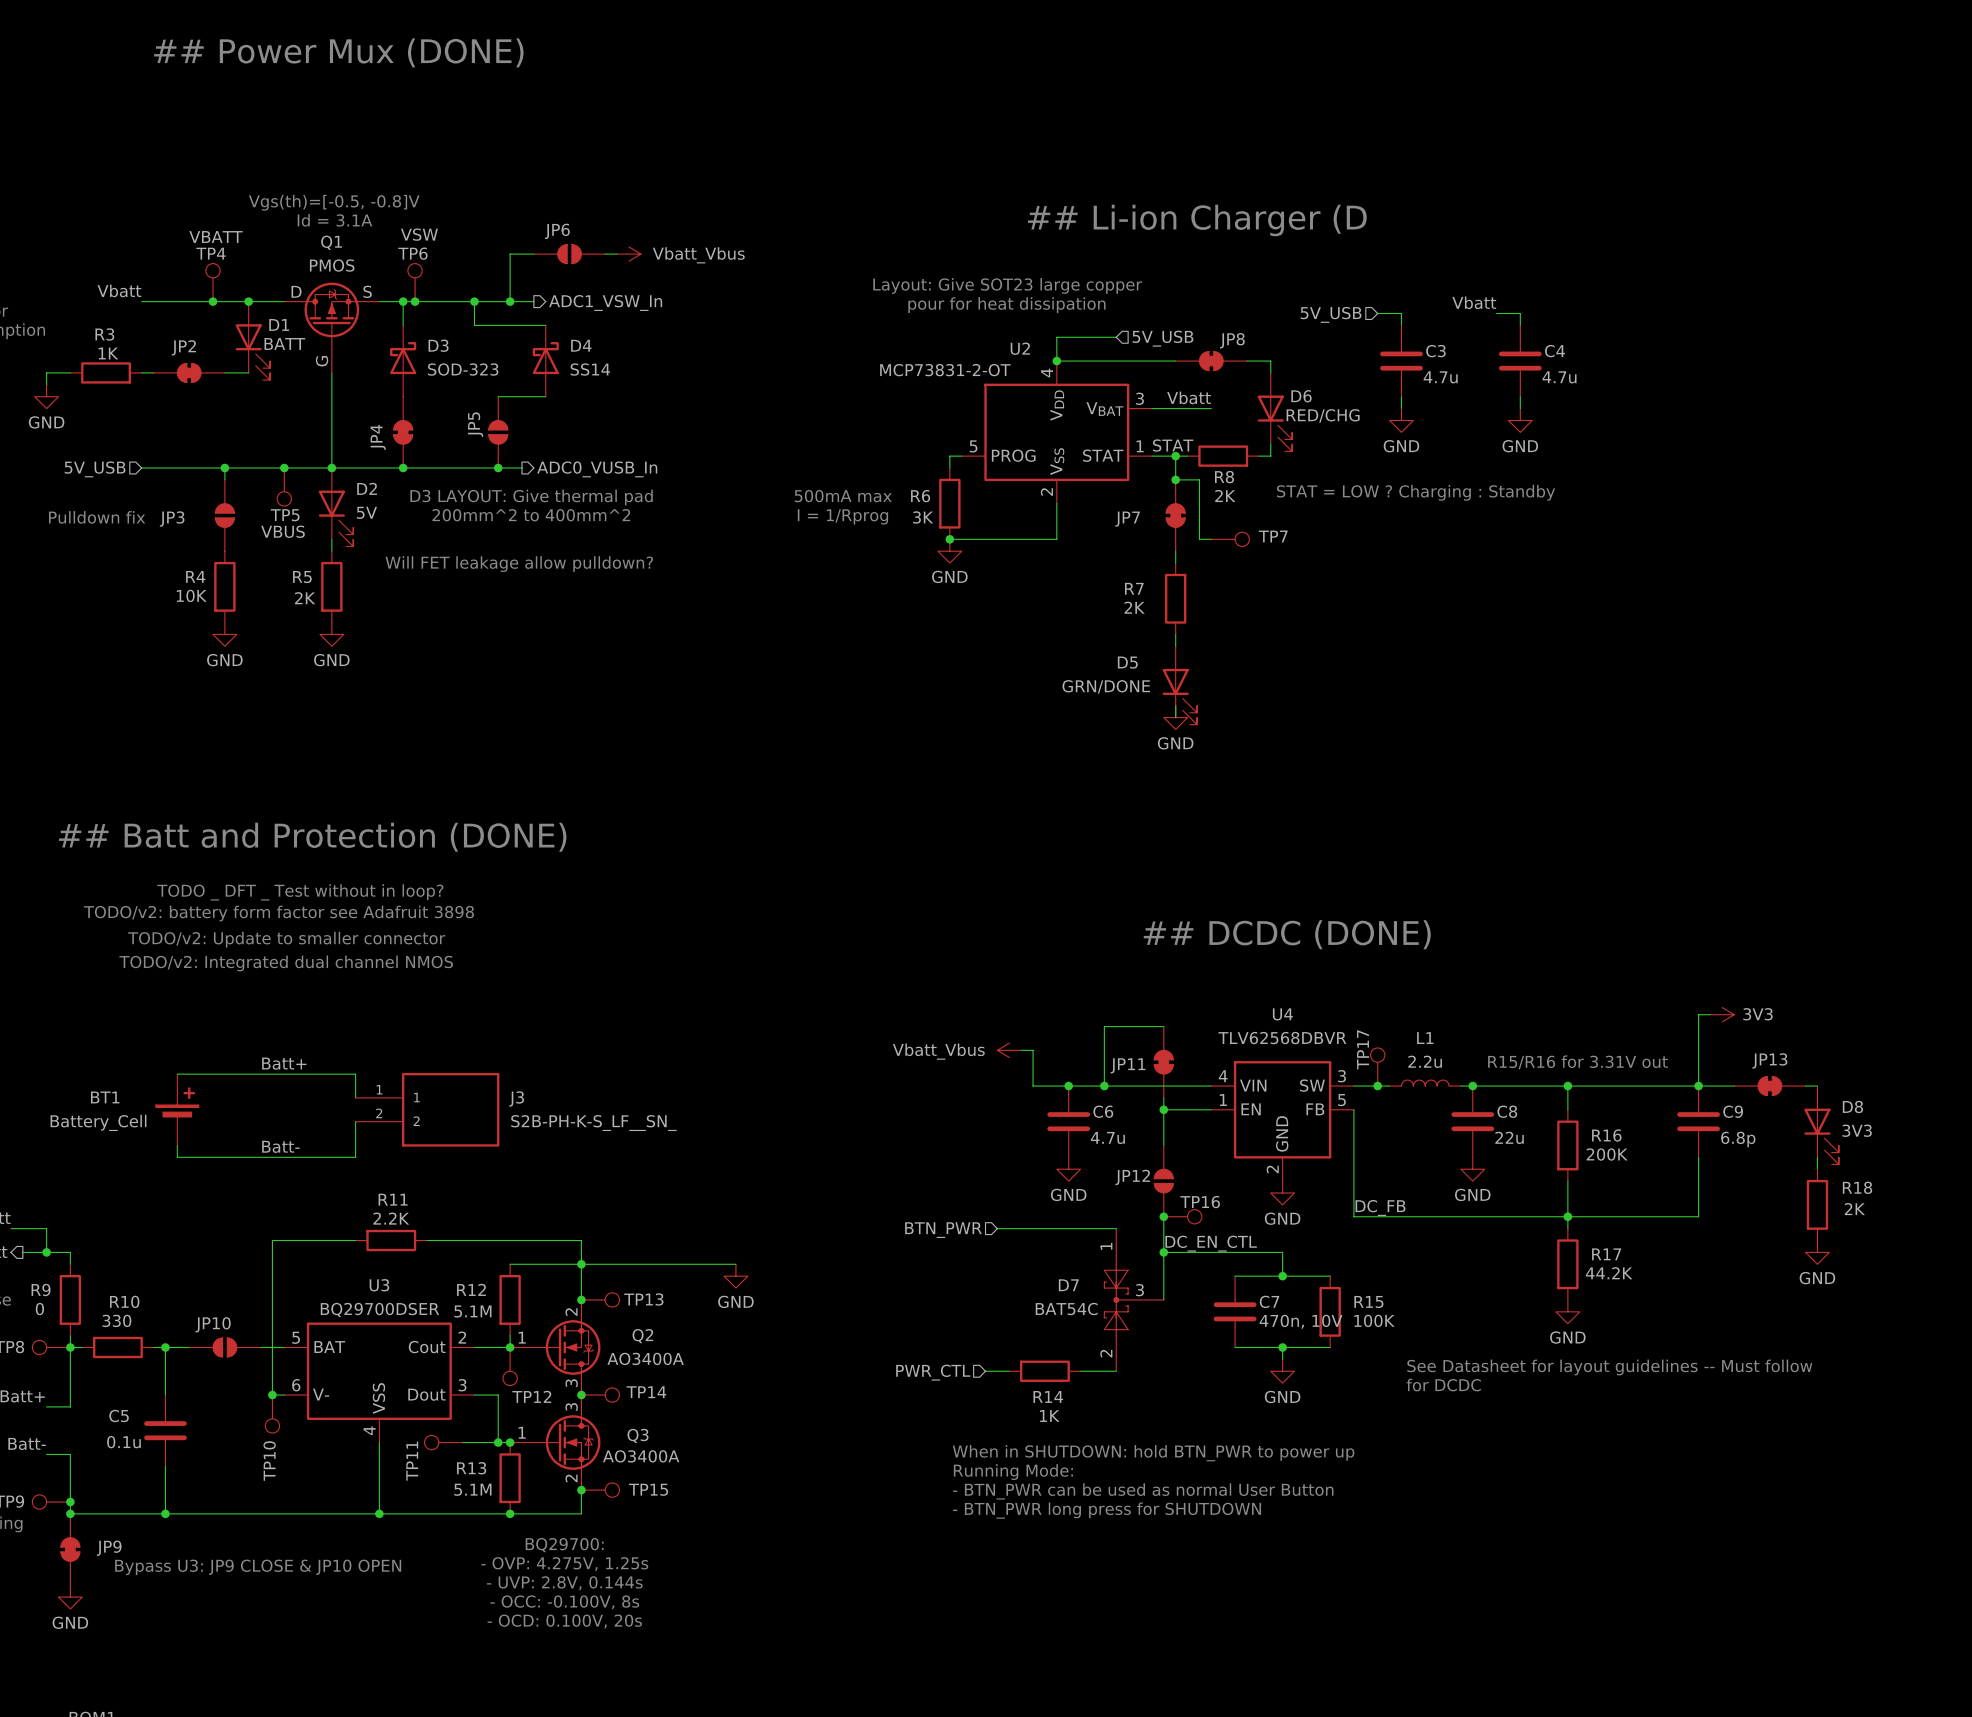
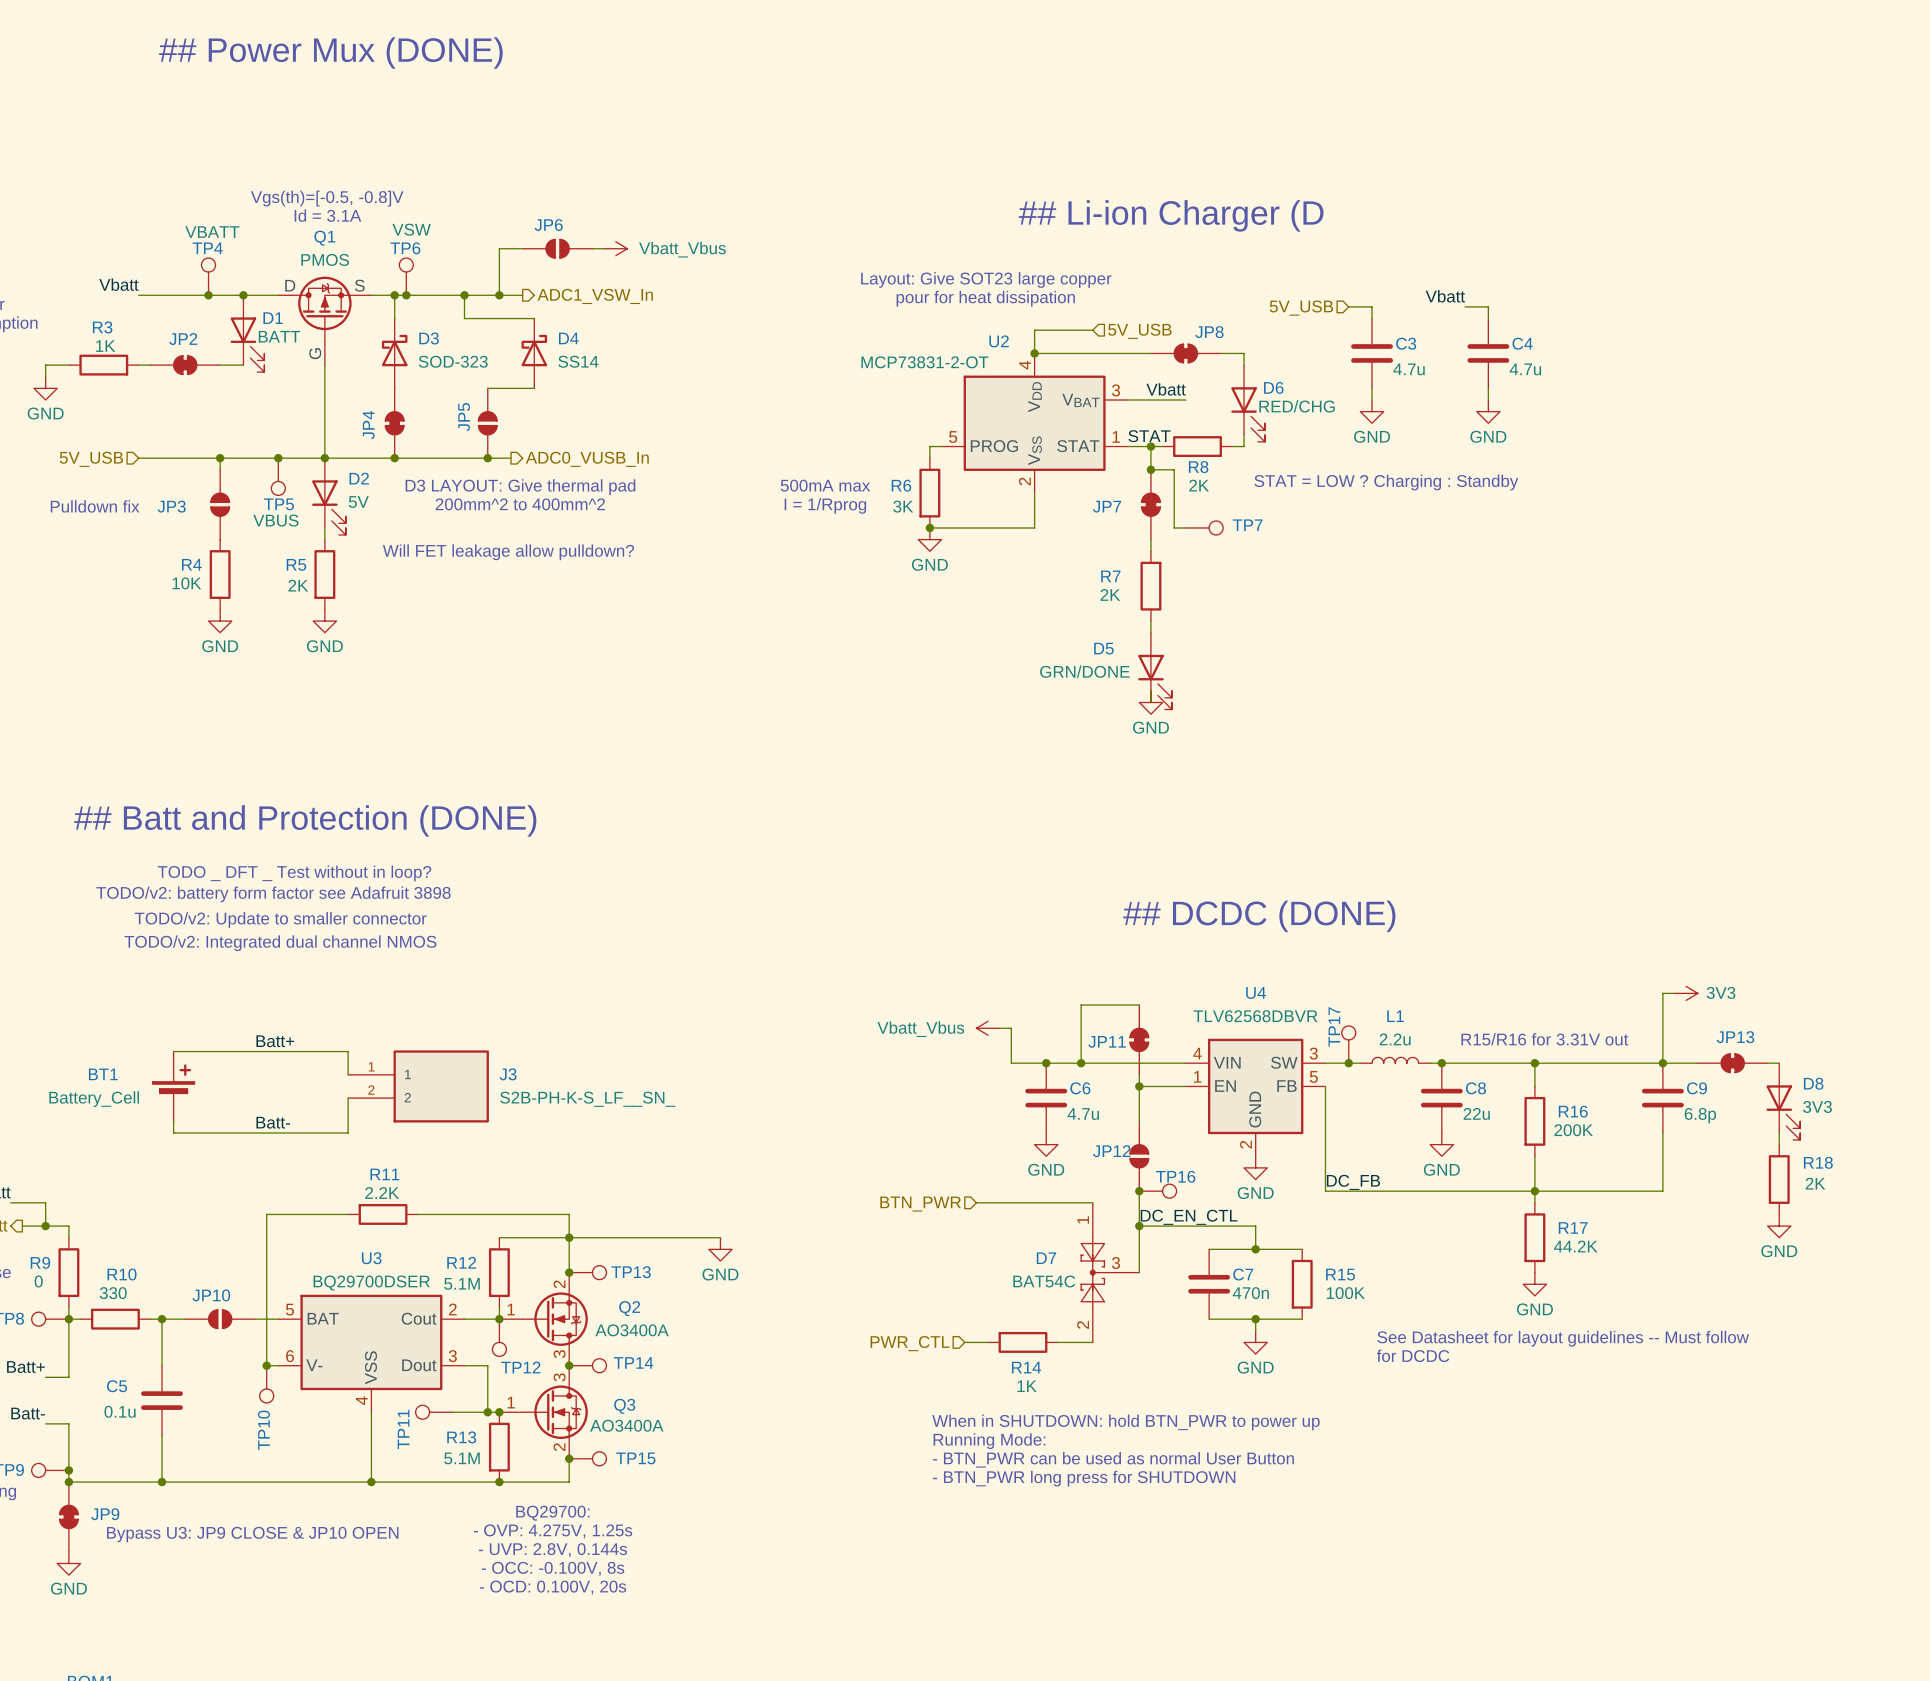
C7 value: 470n, 10V (1301, 1321) -> 470n (1250, 1293)

